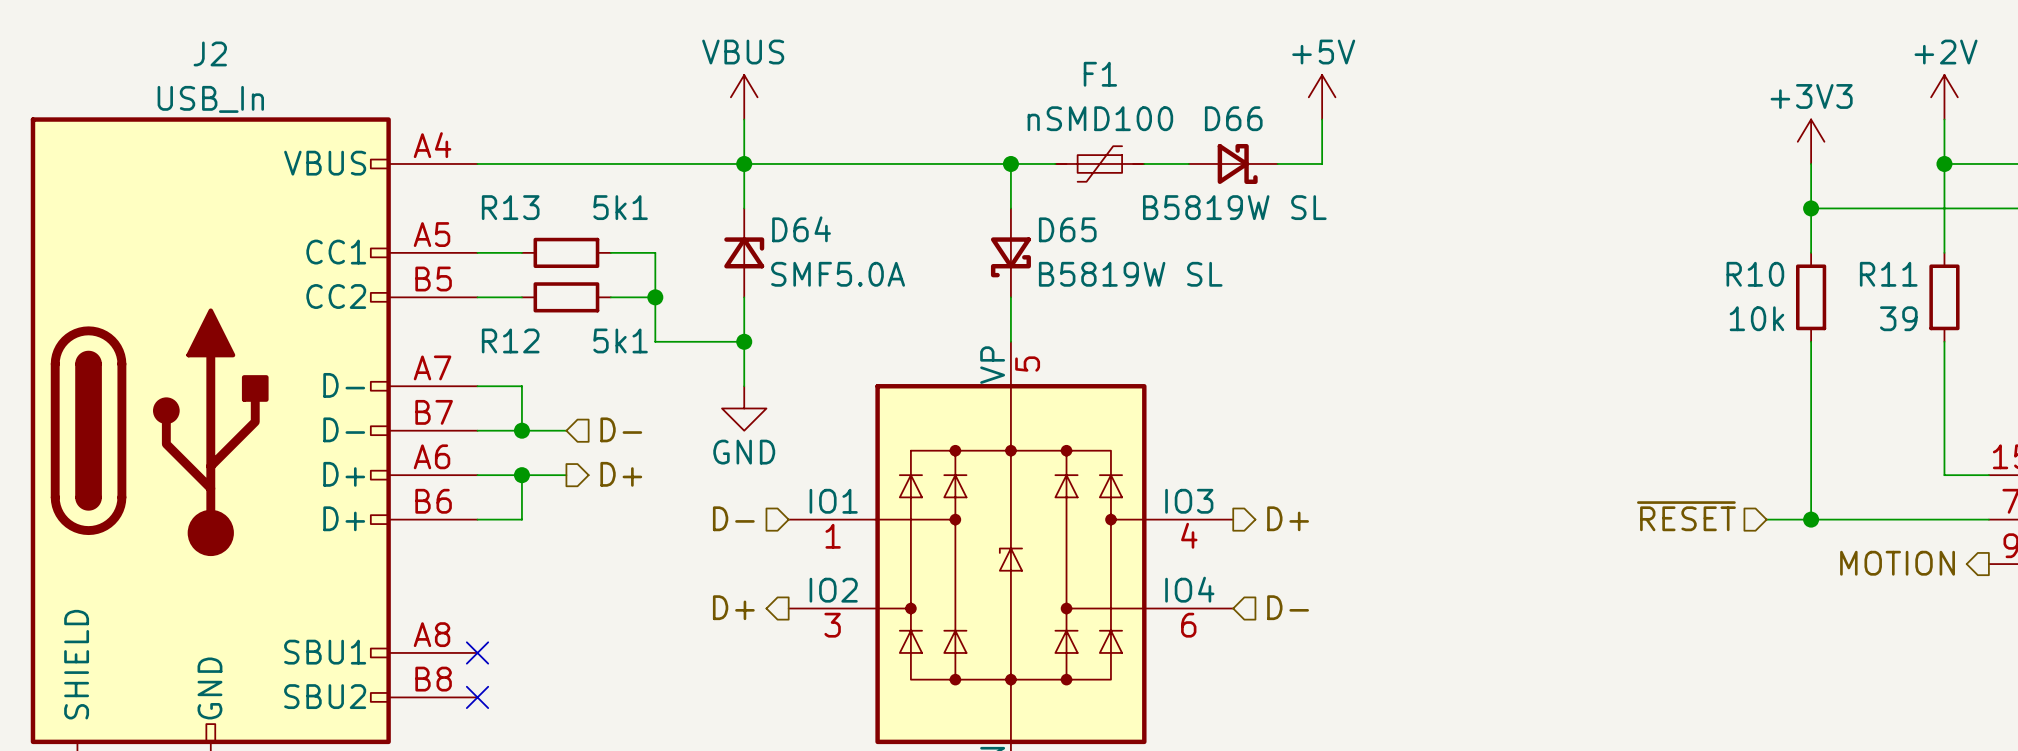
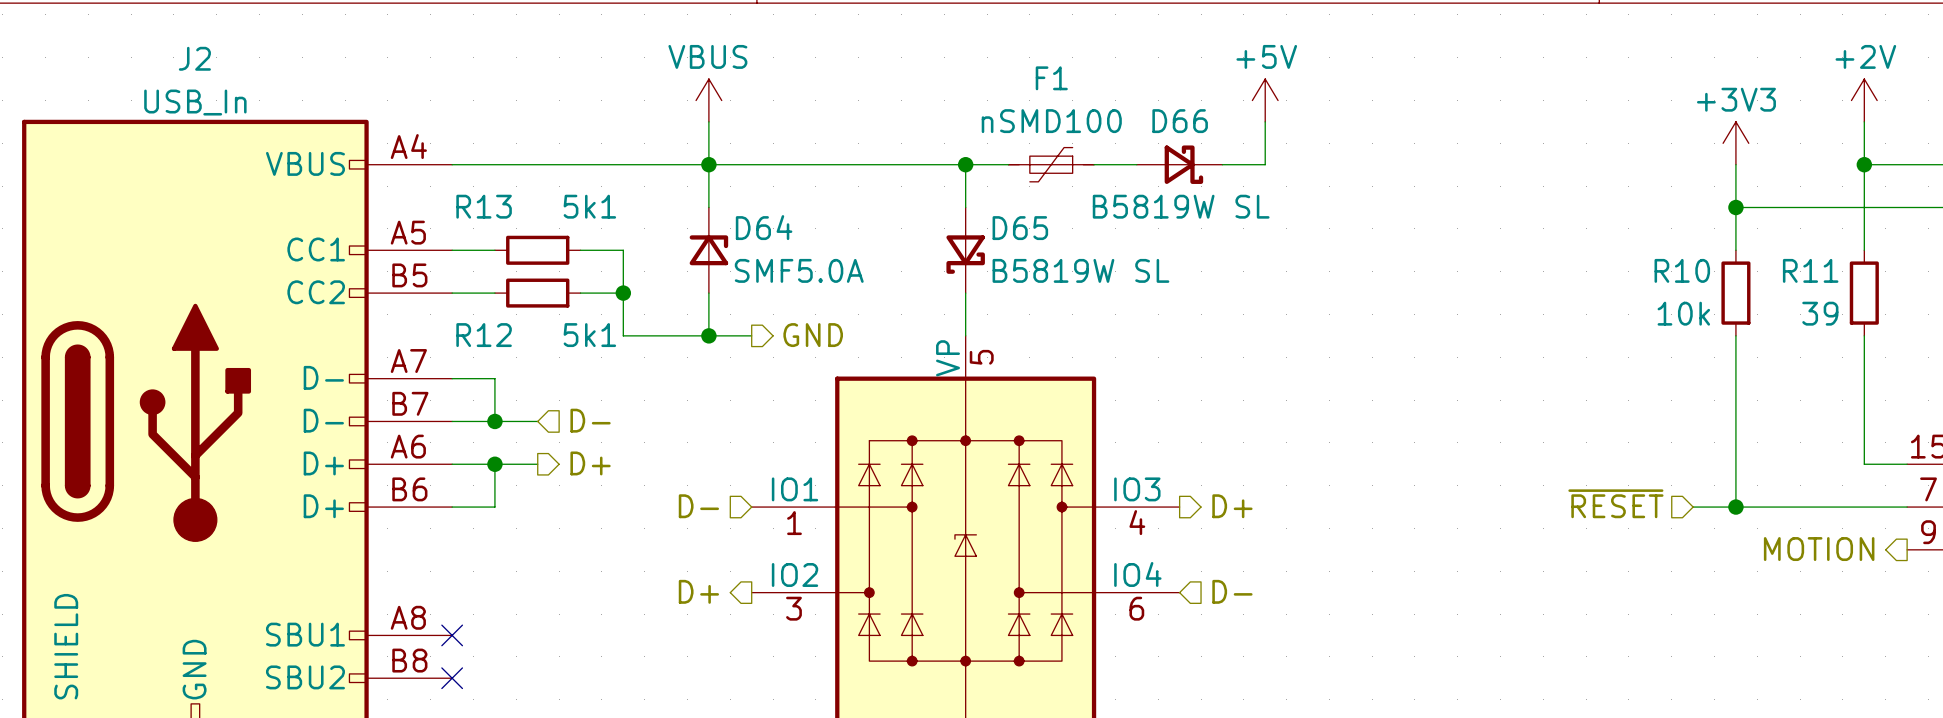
hierarchical label: none -> GND (813, 335)
wire: (744, 341) (744, 386) -> (708, 335) (751, 335)
power symbol: GND (744, 408) -> none

